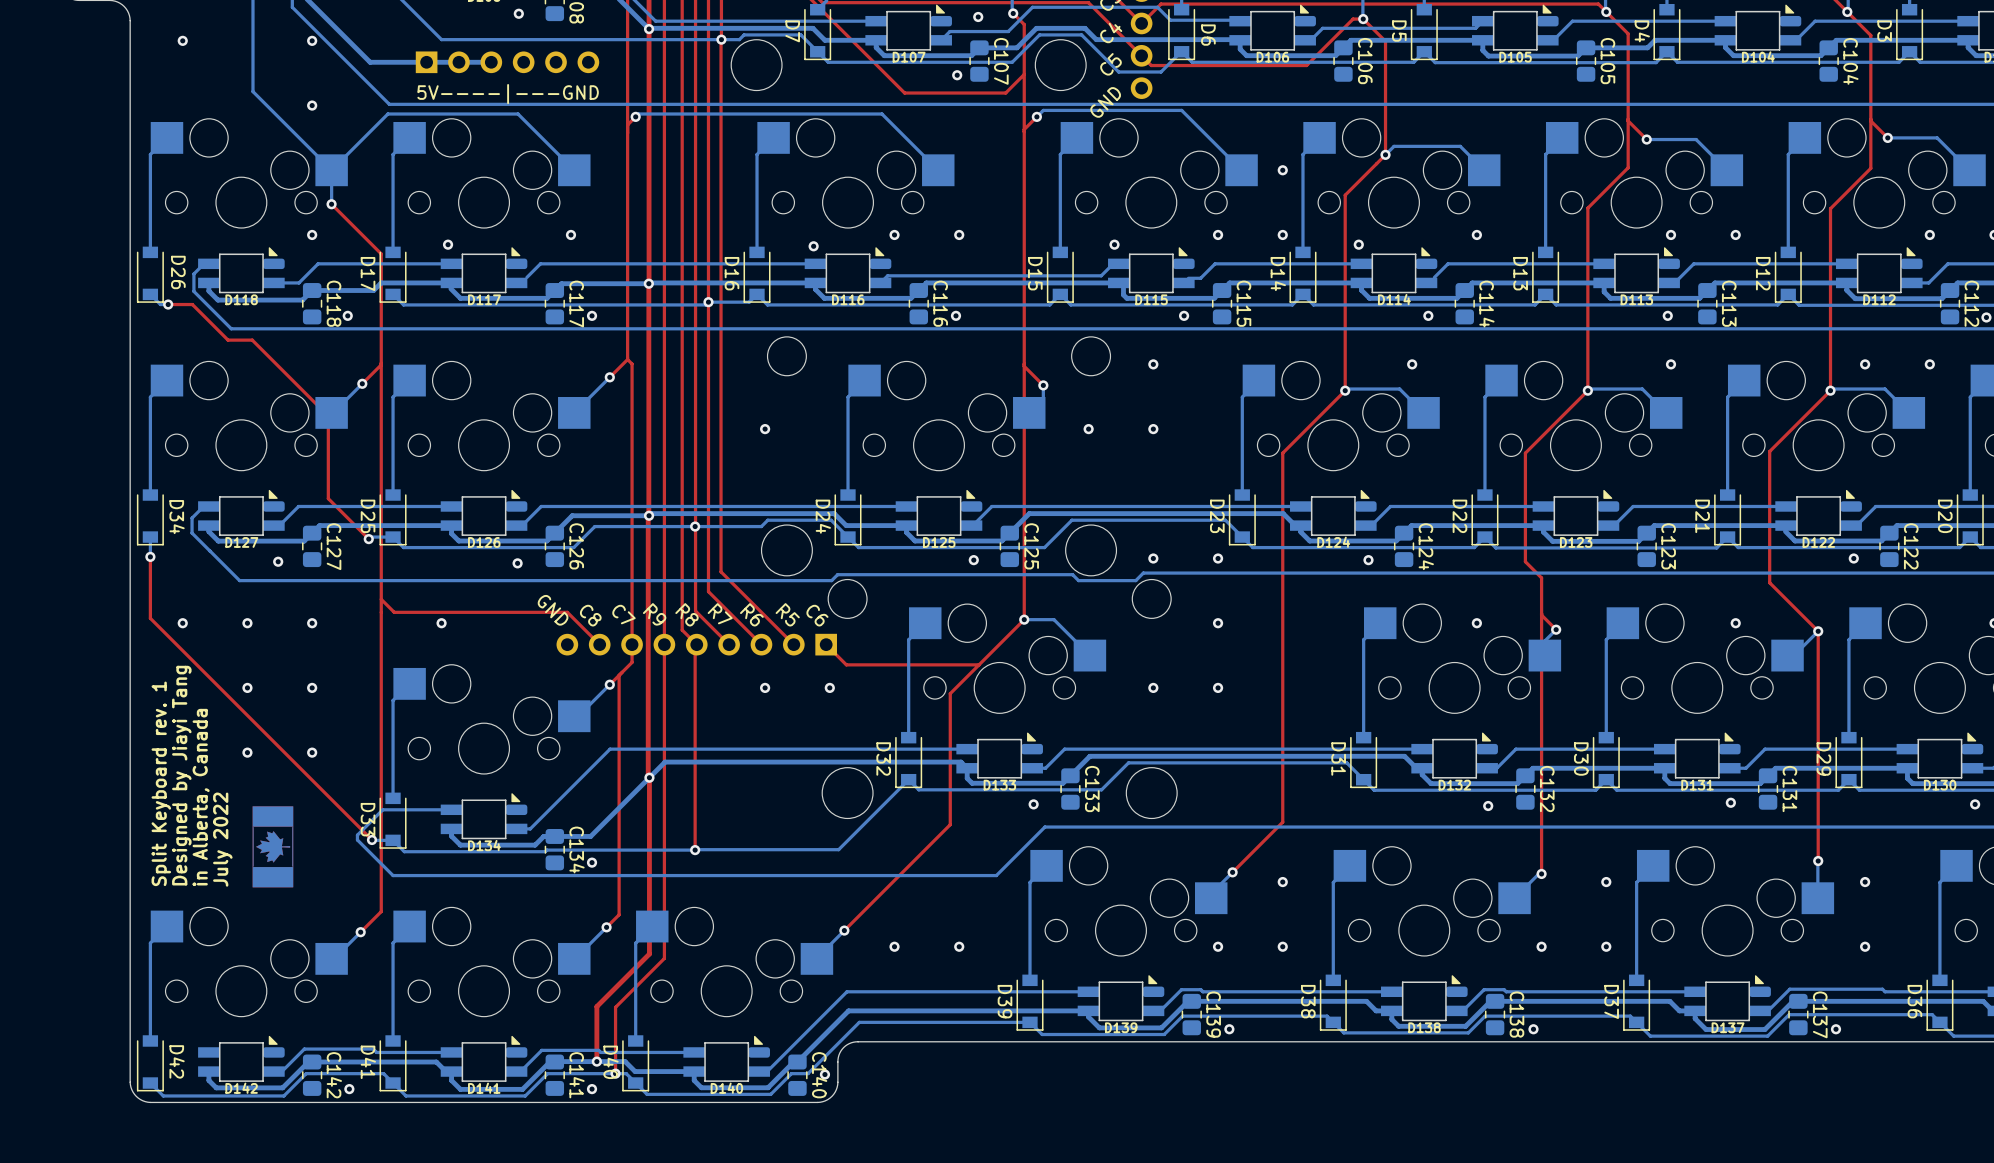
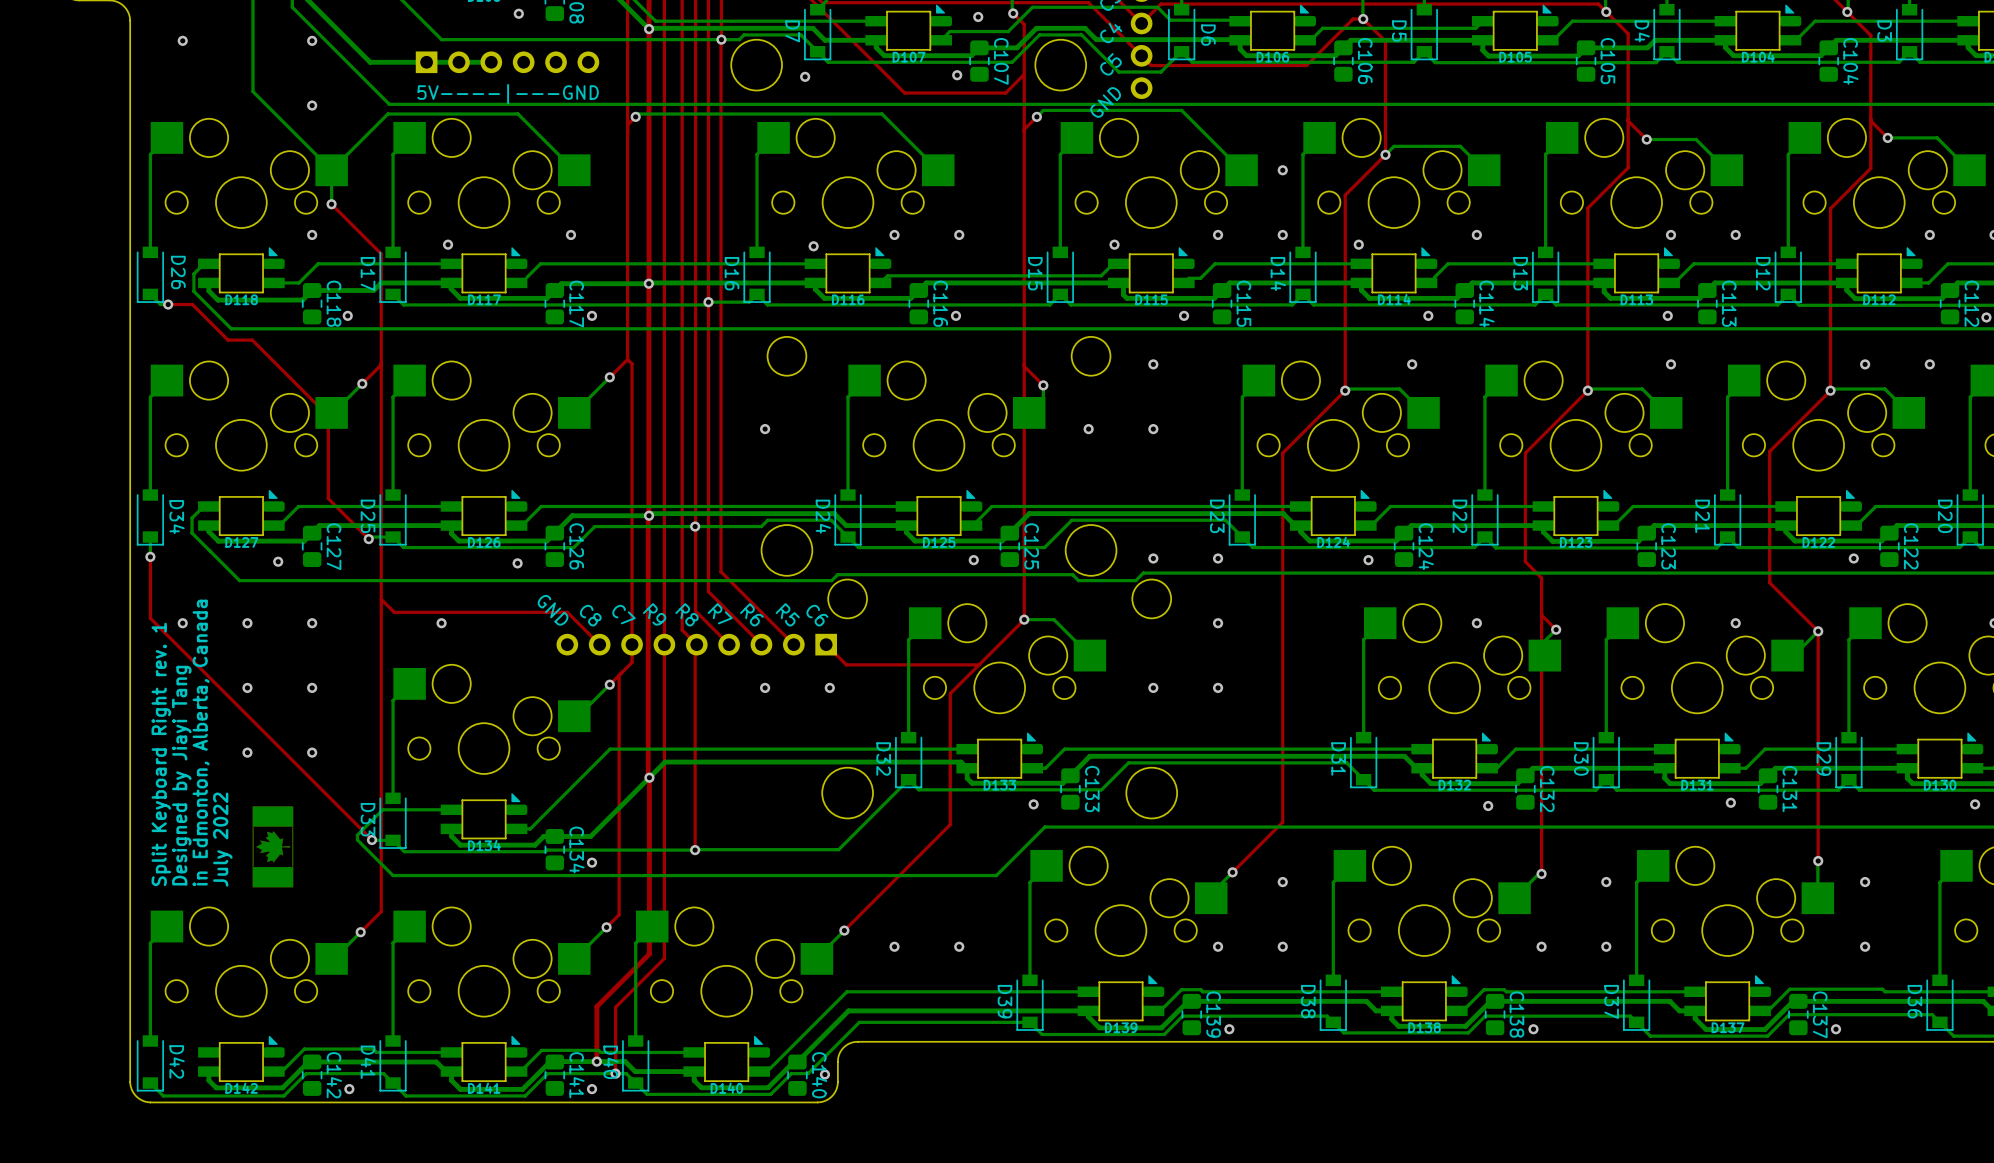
via: none -> (805, 76)
text: Split Keyboard rev. 1 (161, 783) -> Split Keyboard Right rev. 1 (161, 754)
text: in Alberta, Canada (201, 797) -> in Edmonton, Alberta, Canada (201, 742)

